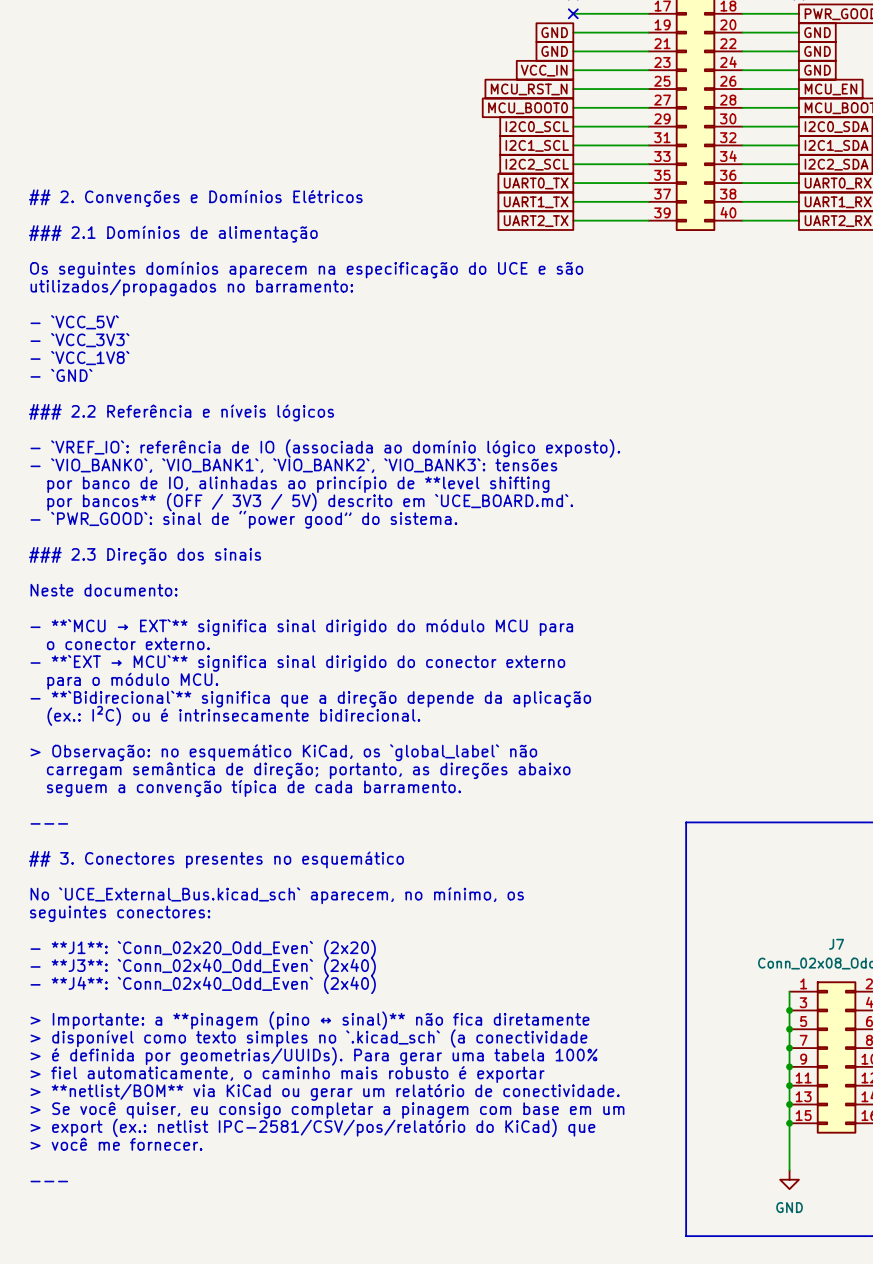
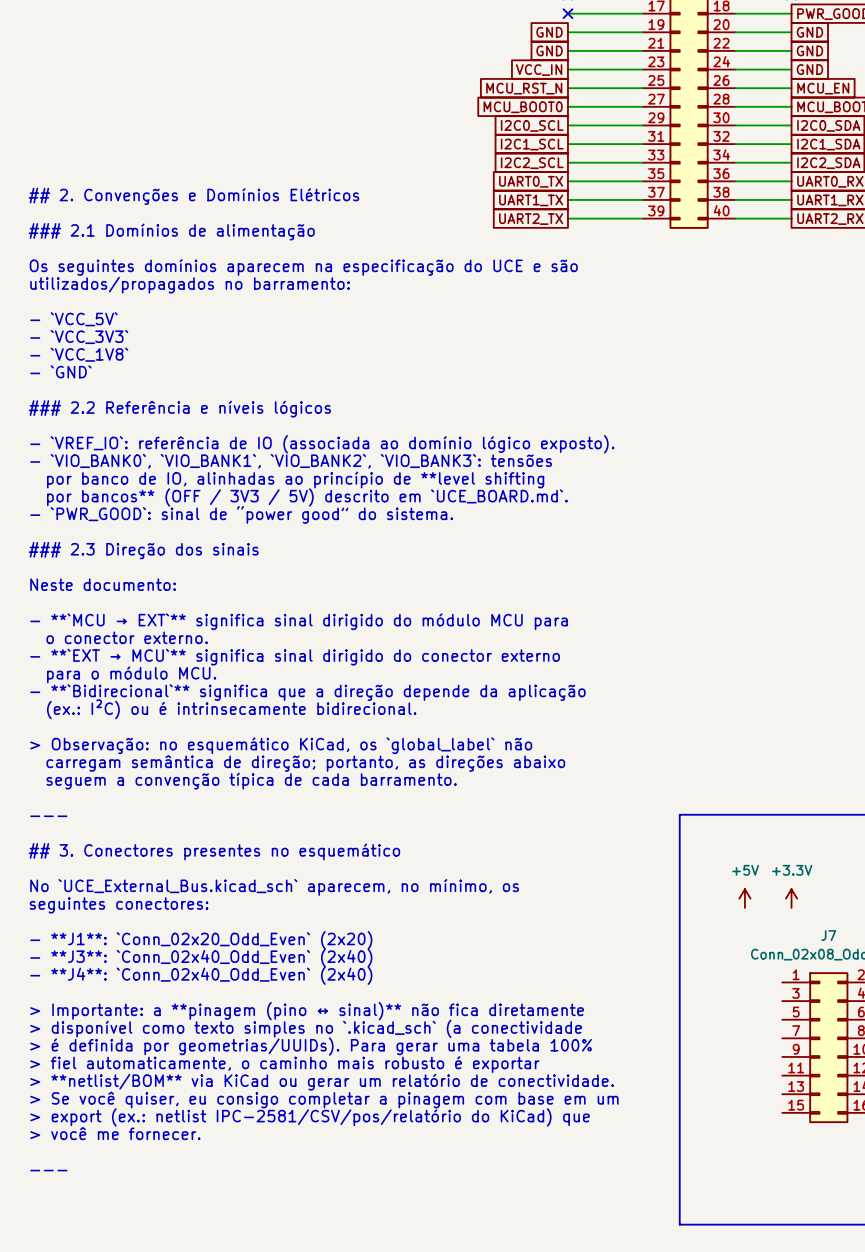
power symbol: none -> +5V (744, 898)
power symbol: none -> +3.3V (791, 898)
wire: (789, 991) (789, 1170) -> none
junction: (789, 1010) -> none
junction: (789, 1029) -> none
junction: (789, 1048) -> none
junction: (789, 1066) -> none
junction: (789, 1085) -> none
junction: (789, 1104) -> none
junction: (789, 1123) -> none
power symbol: GND (789, 1179) -> none

